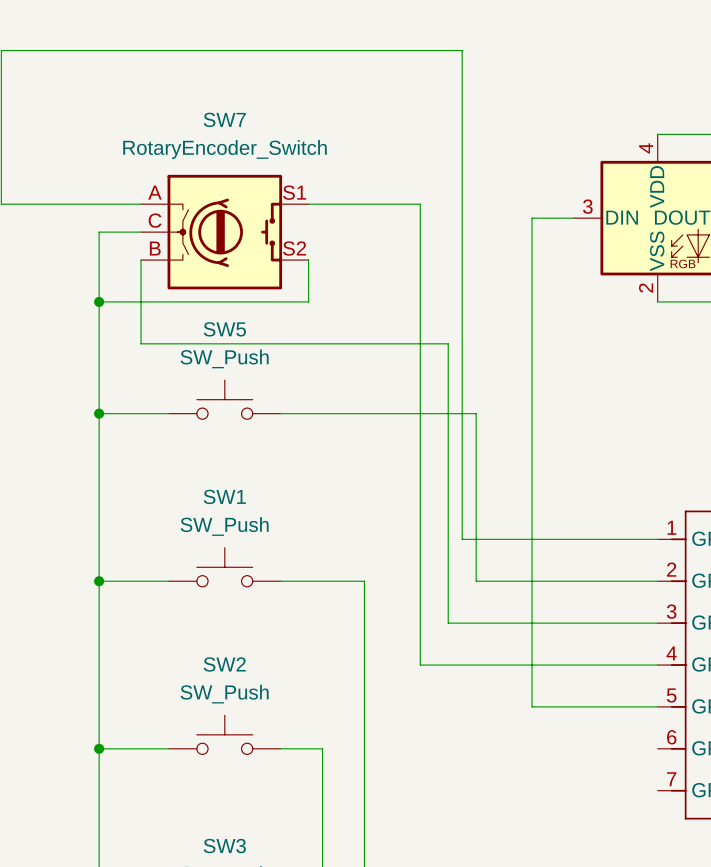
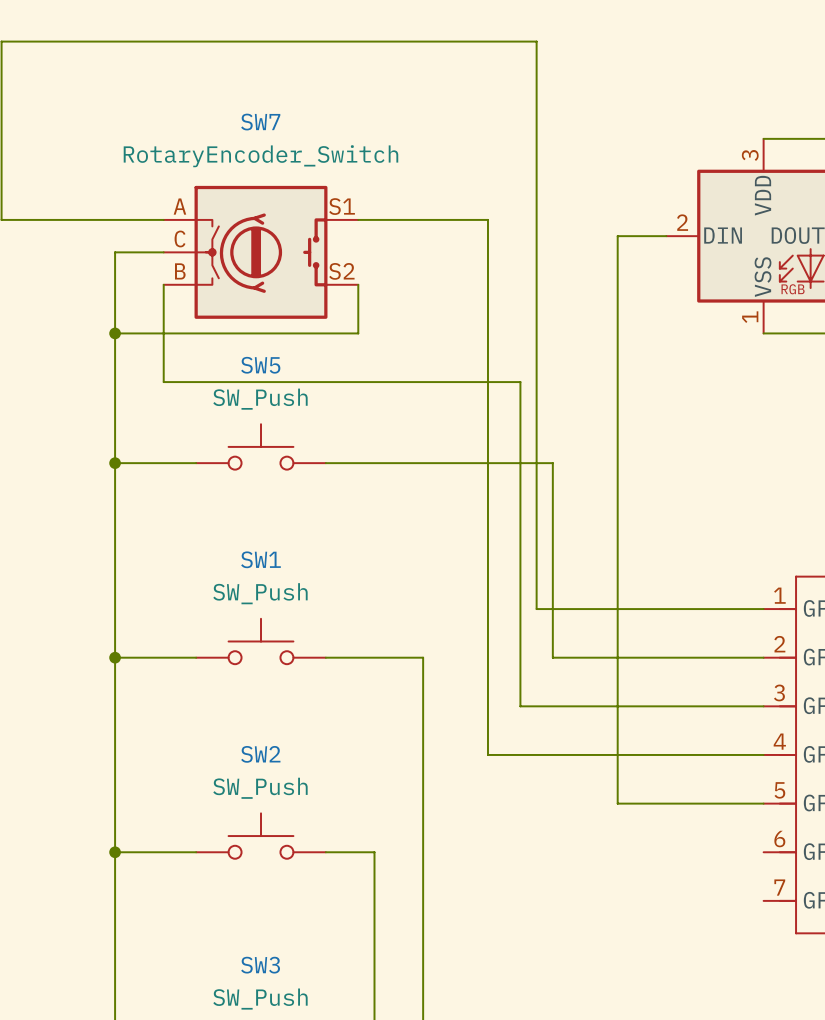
part pin number: 4 (646, 148) -> 3 (750, 155)
part pin number: 3 (587, 206) -> 2 (682, 222)
part pin number: 2 (646, 287) -> 1 (750, 317)

